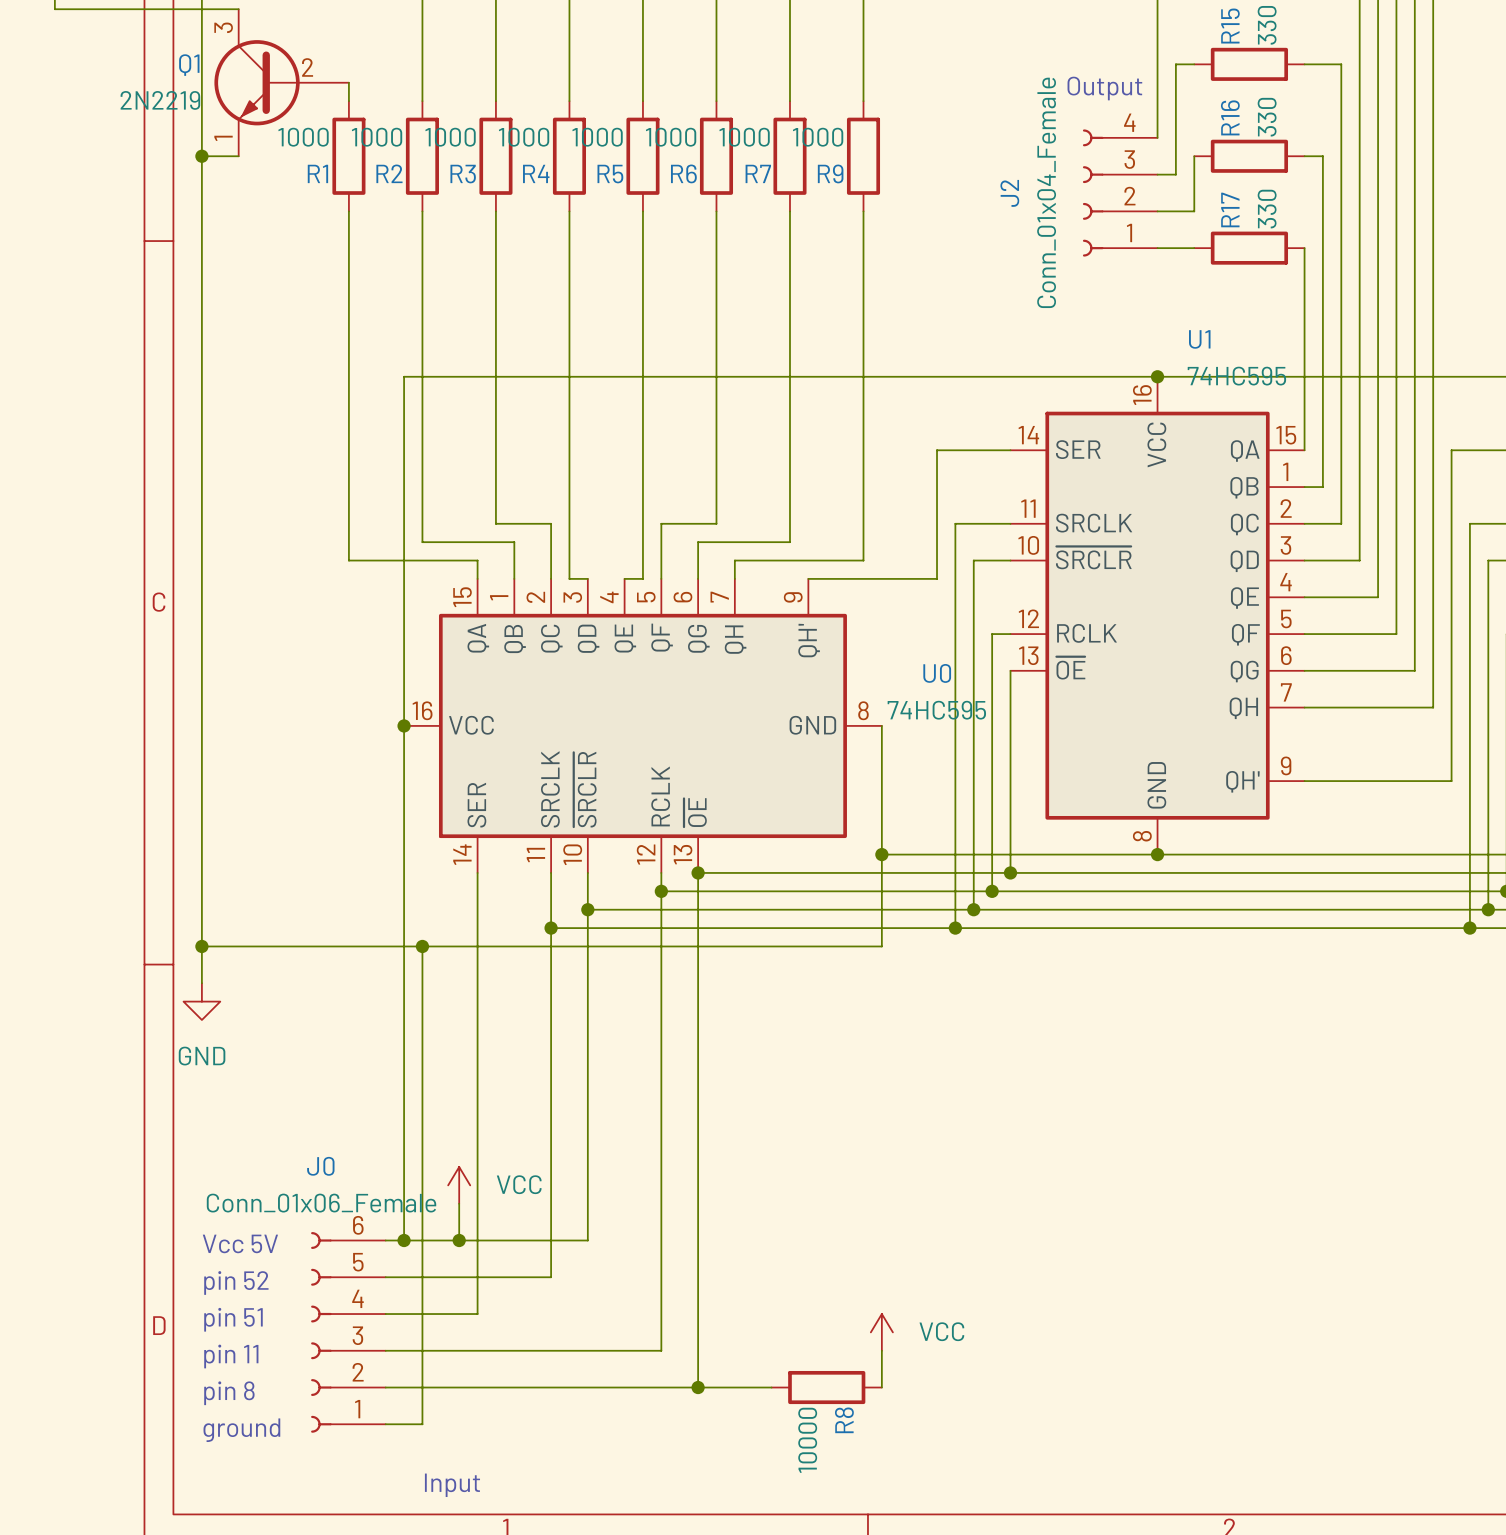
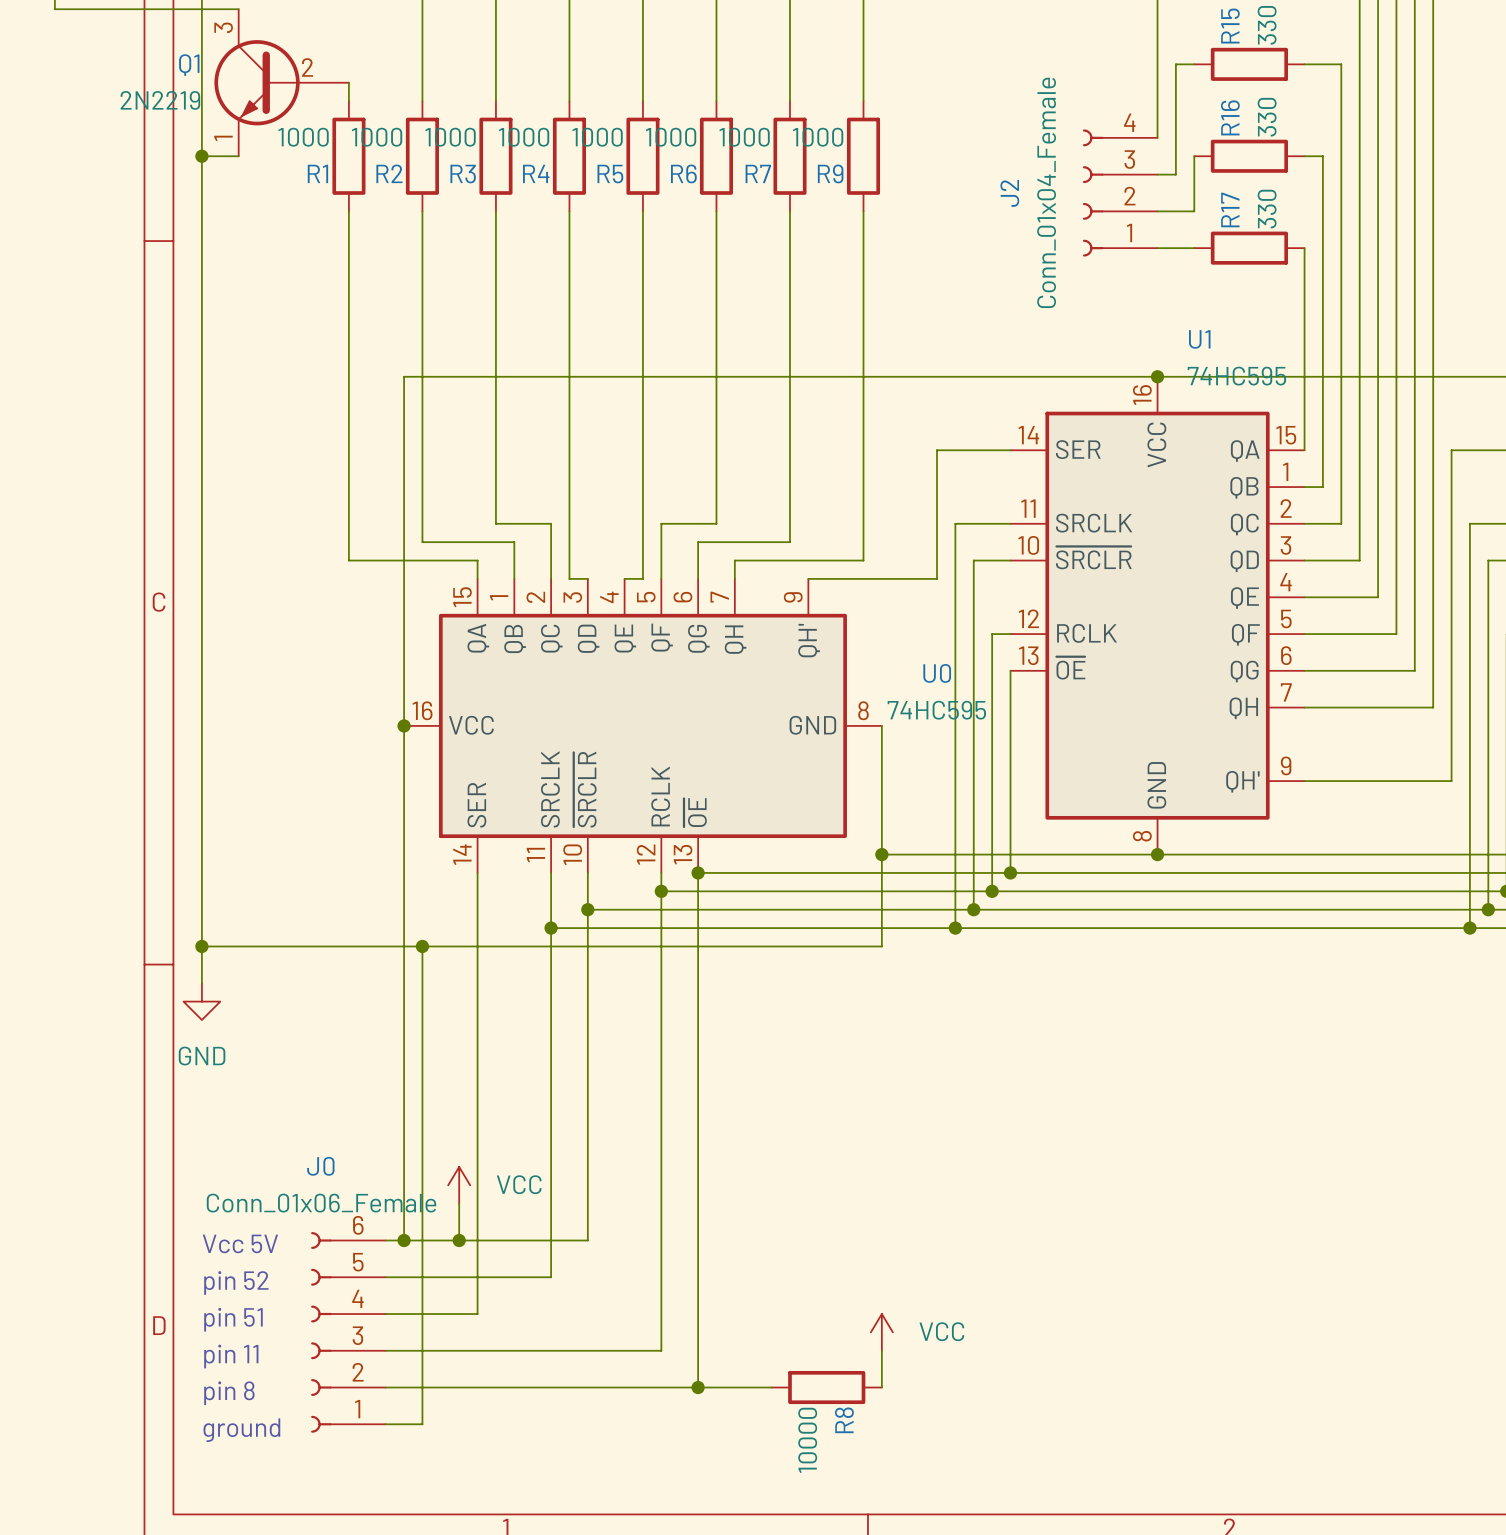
text: Output (1104, 88) -> none
text: Input (452, 1485) -> none

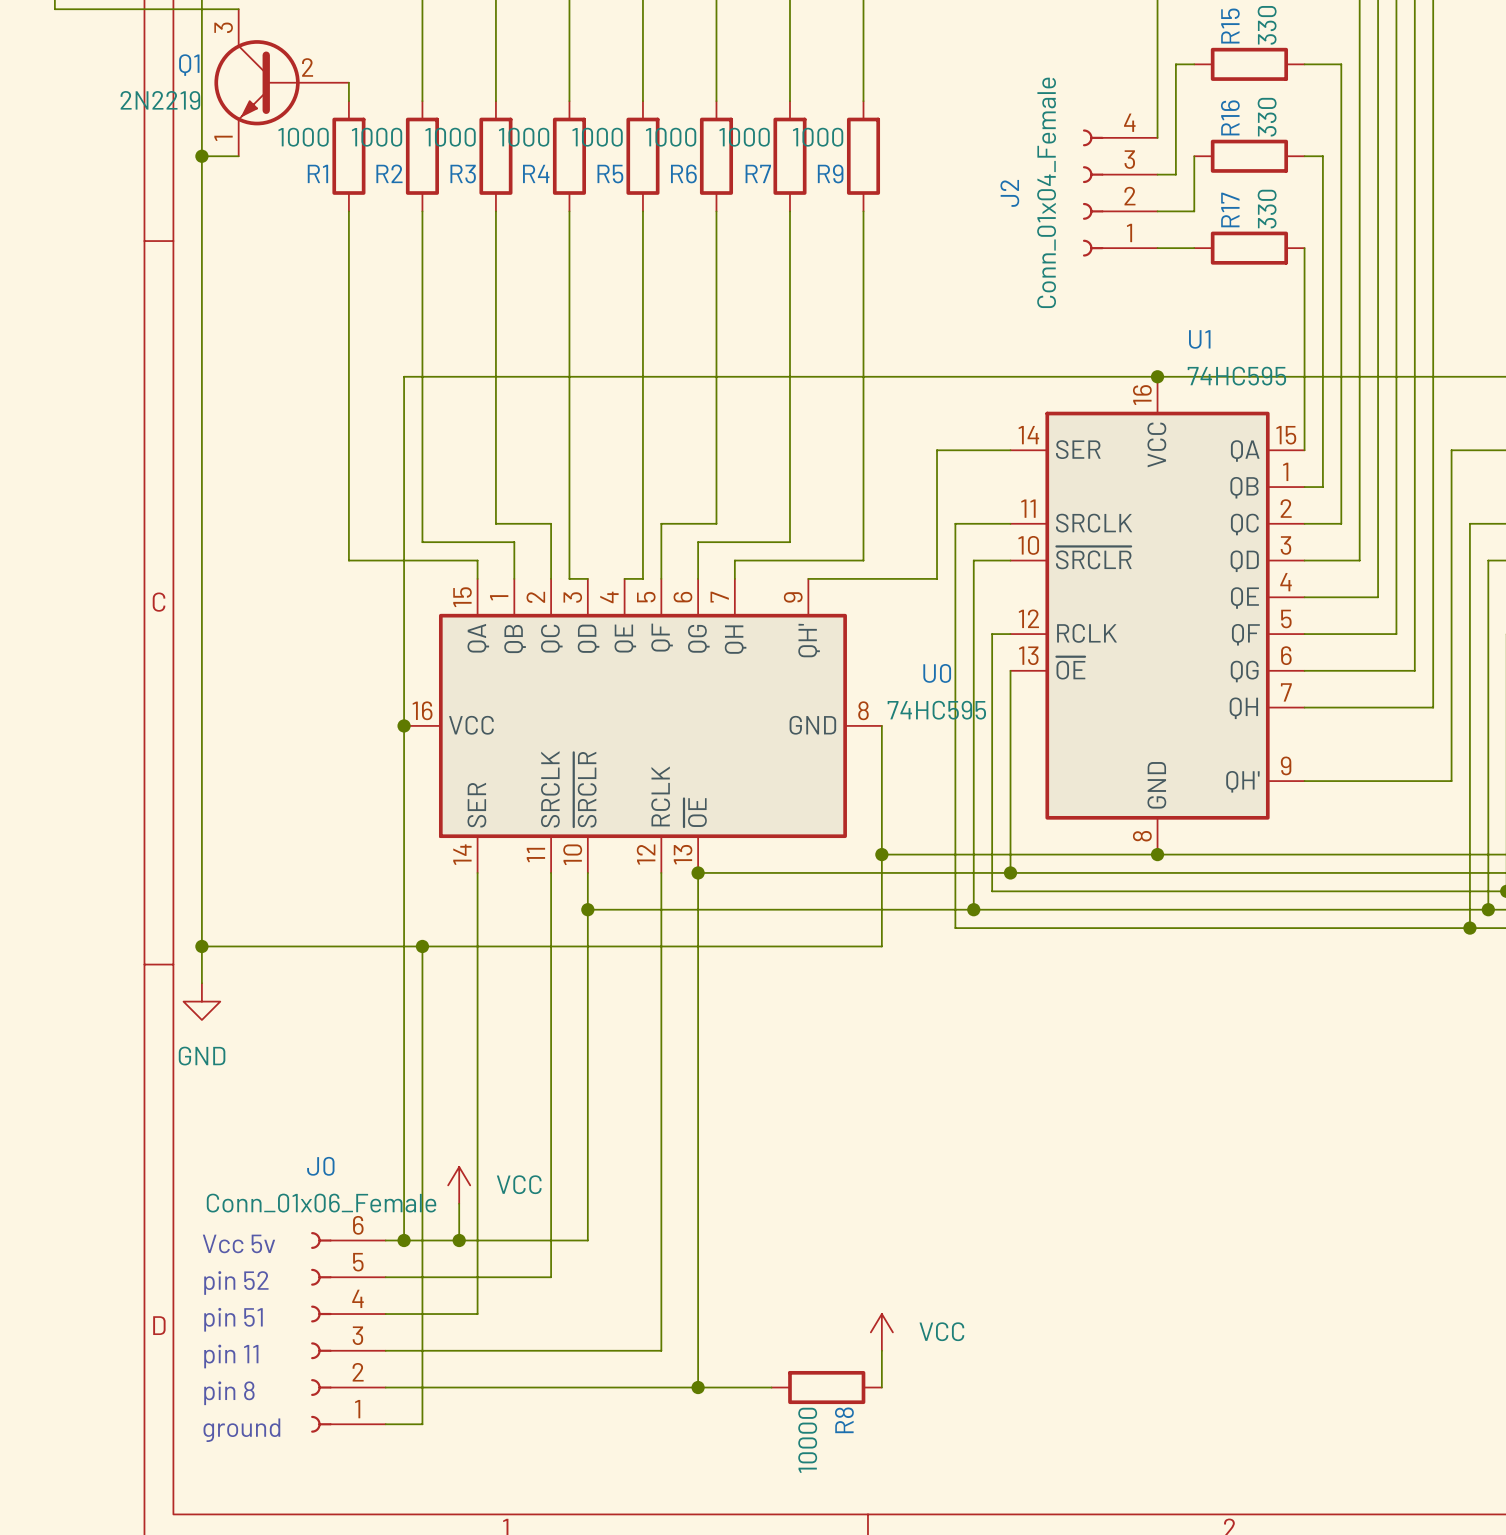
wire: (661, 891) (992, 891) -> none
junction: (661, 891) -> none
junction: (992, 891) -> none
wire: (551, 928) (955, 928) -> none
junction: (551, 928) -> none
junction: (955, 928) -> none
text: Vcc 5V (240, 1243) -> Vcc 5v (238, 1243)

